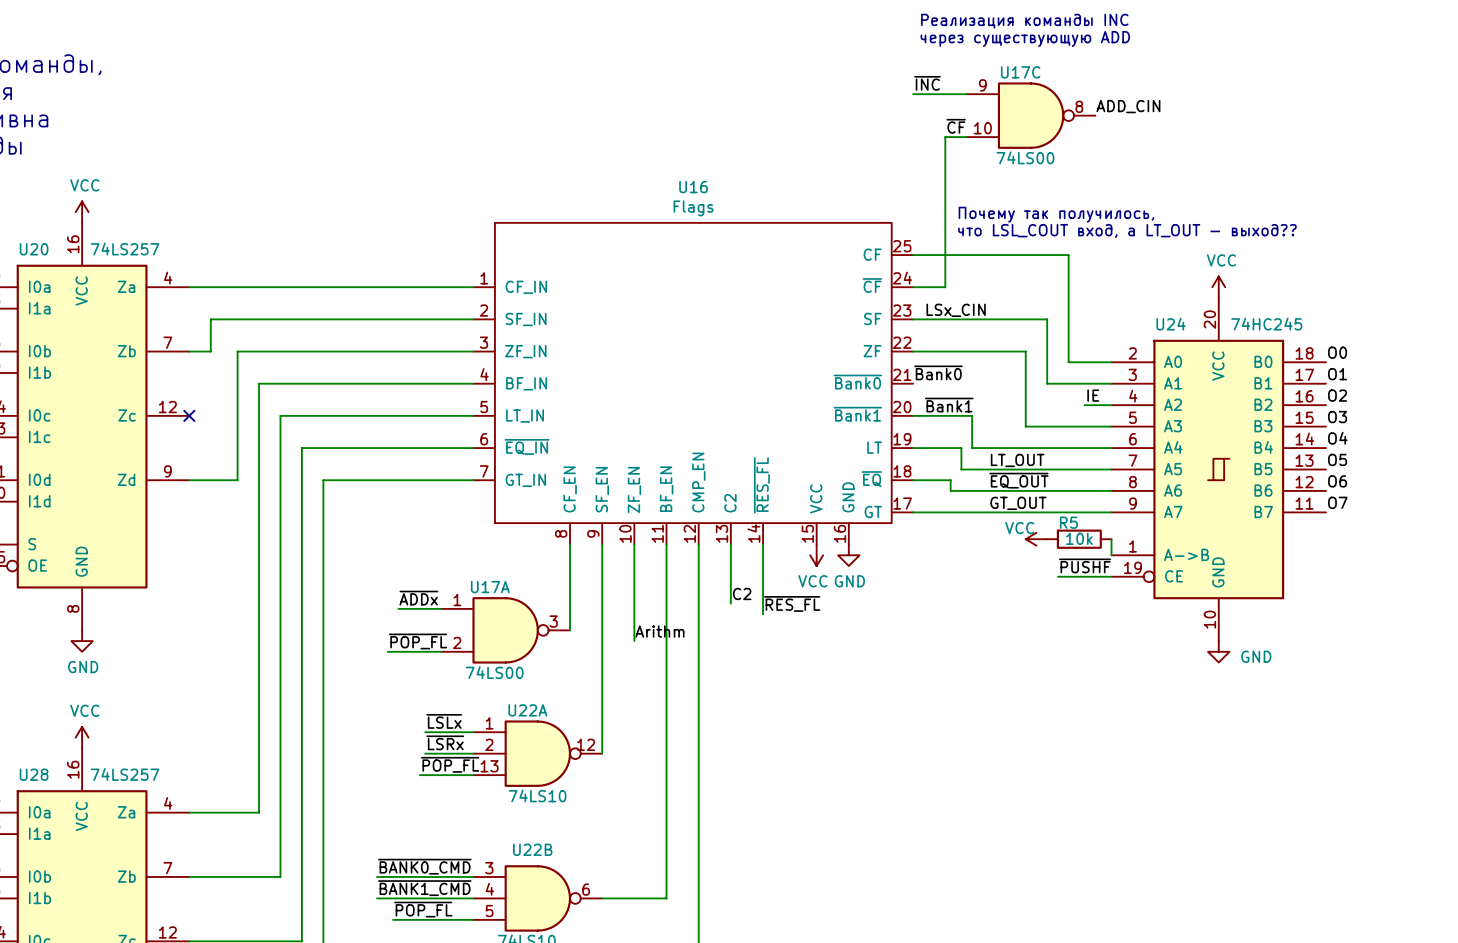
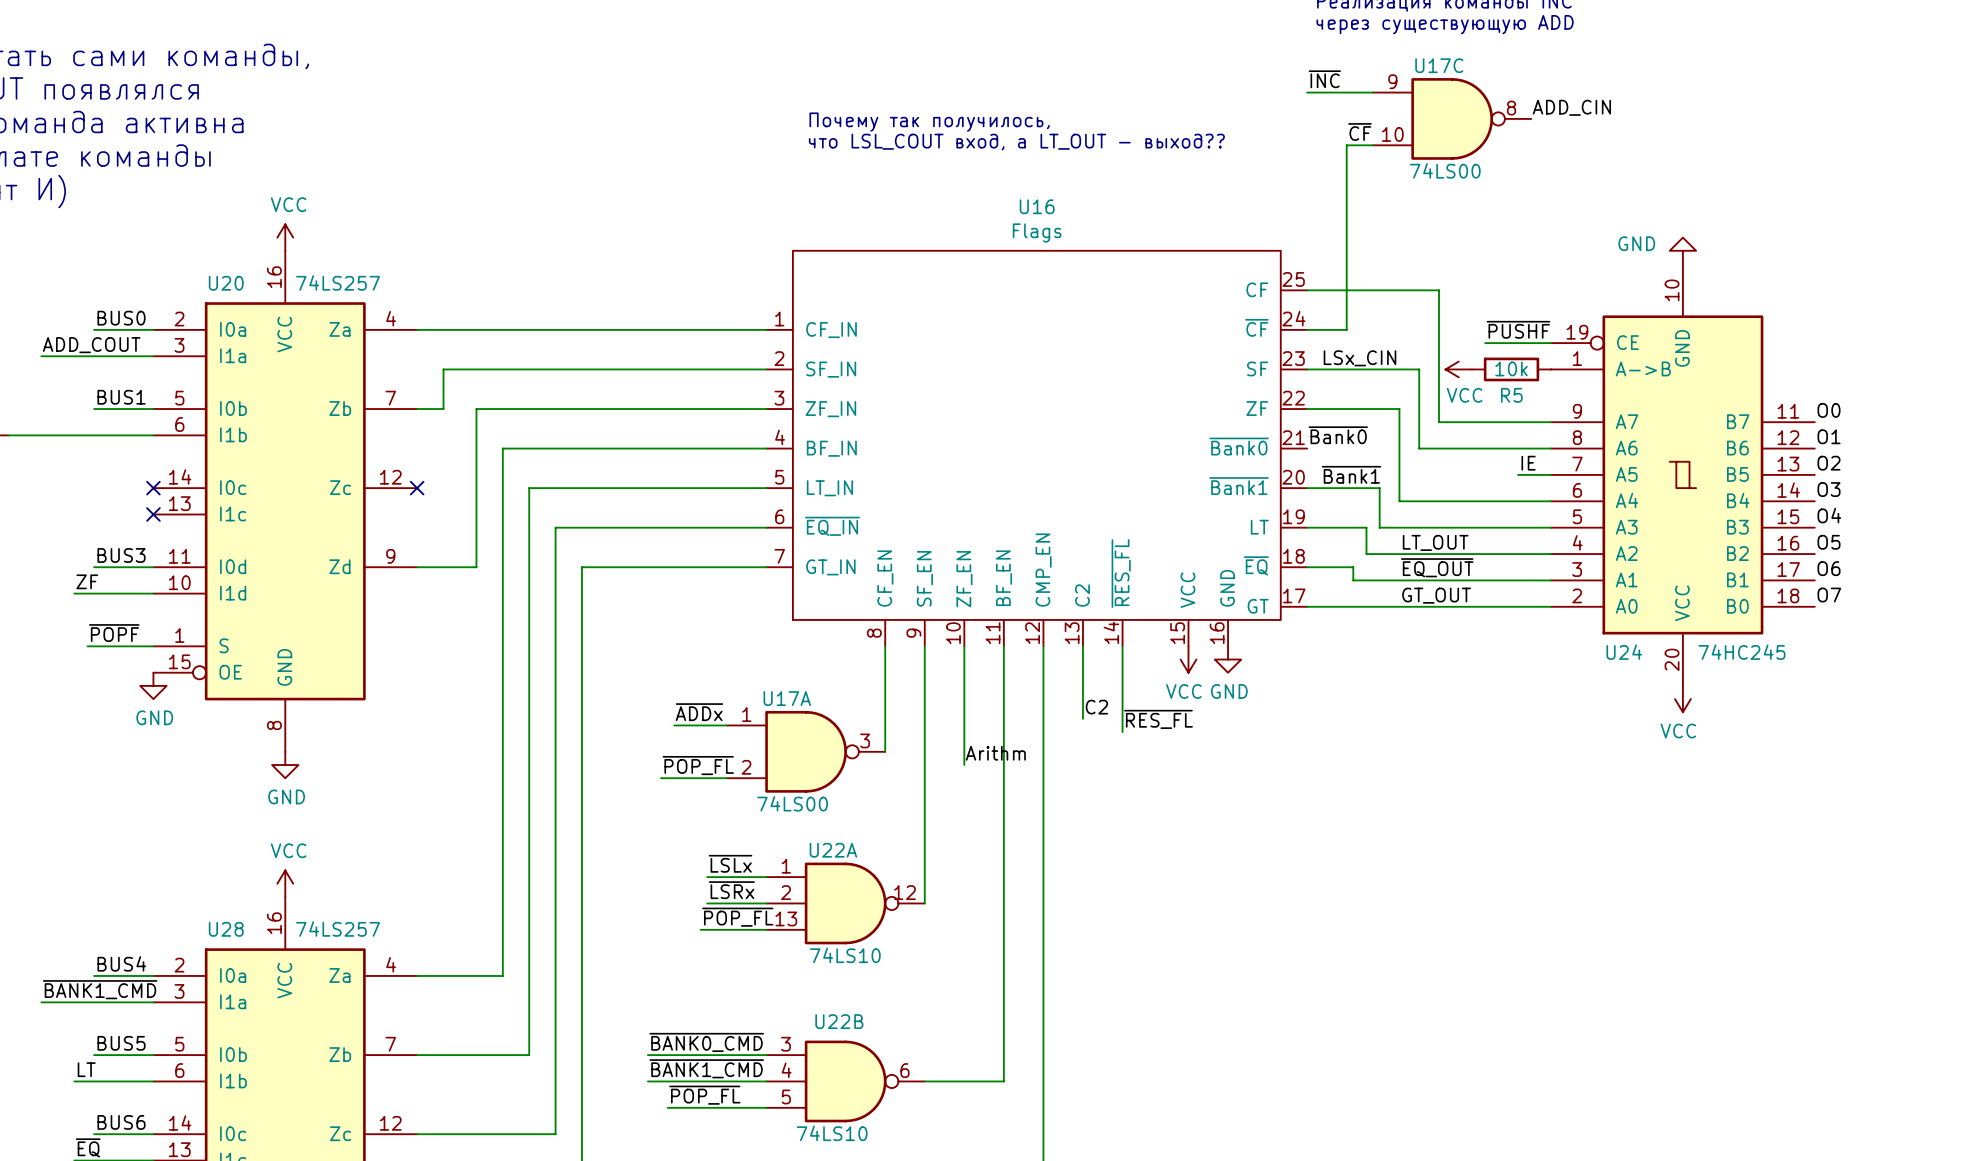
text: none -> Почему так получилось, (929, 122)
text: none -> что LSL_COUT вход, а LT_OUT - выход?? (1016, 142)
text: Почему так получилось, (1056, 214) -> none
power symbol: none -> GND (1682, 250)
text: что LSL_COUT вход, а LT_OUT - выход?? (1127, 230) -> none
wire: (1020, 255) (1068, 255) (1068, 362) -> (1439, 290) (1439, 422) (1498, 422)
label: none -> ~{PUSHF} (1518, 329)
power symbol: VCC (1218, 287) -> none
wire: none -> (1485, 343) (1551, 343)
wire: (1004, 319) (1047, 319) (1047, 383) -> (1419, 369) (1419, 448) (1471, 448)
power symbol: none -> VCC (1458, 369)
wire: (988, 351) (1025, 351) (1025, 426) -> (1399, 409) (1399, 501) (1445, 501)
U24 flip: as is (1218, 469) -> up-down (1682, 474)
R5 name position: R5 (1068, 522) -> R5 (1511, 395)
power symbol: VCC (1036, 539) -> none
R5 position: (1079, 539) -> (1511, 369)
wire: (1111, 539) (1111, 555) -> none
label: ~{PUSHF} (1085, 565) -> none
wire: (1057, 576) (1111, 576) -> none
power symbol: none -> VCC (1682, 699)
power symbol: GND (1218, 651) -> none

